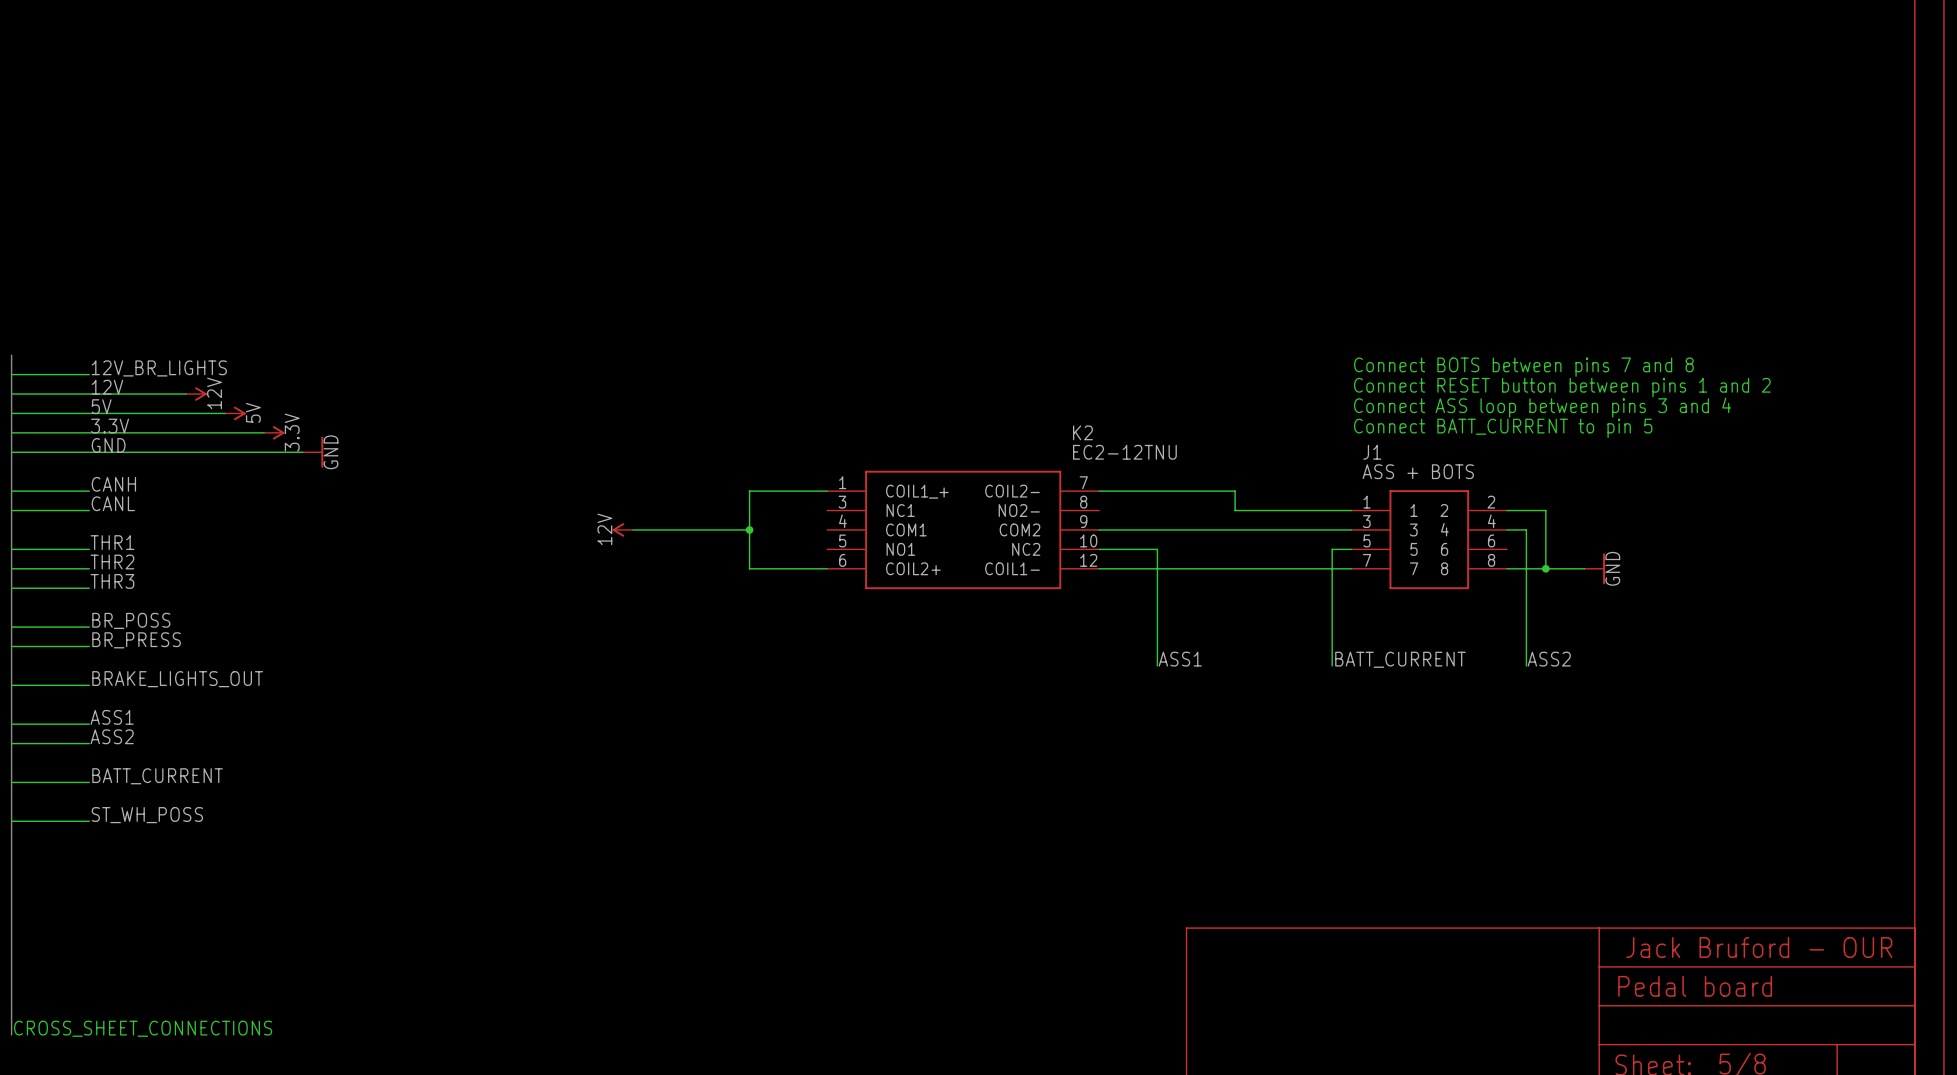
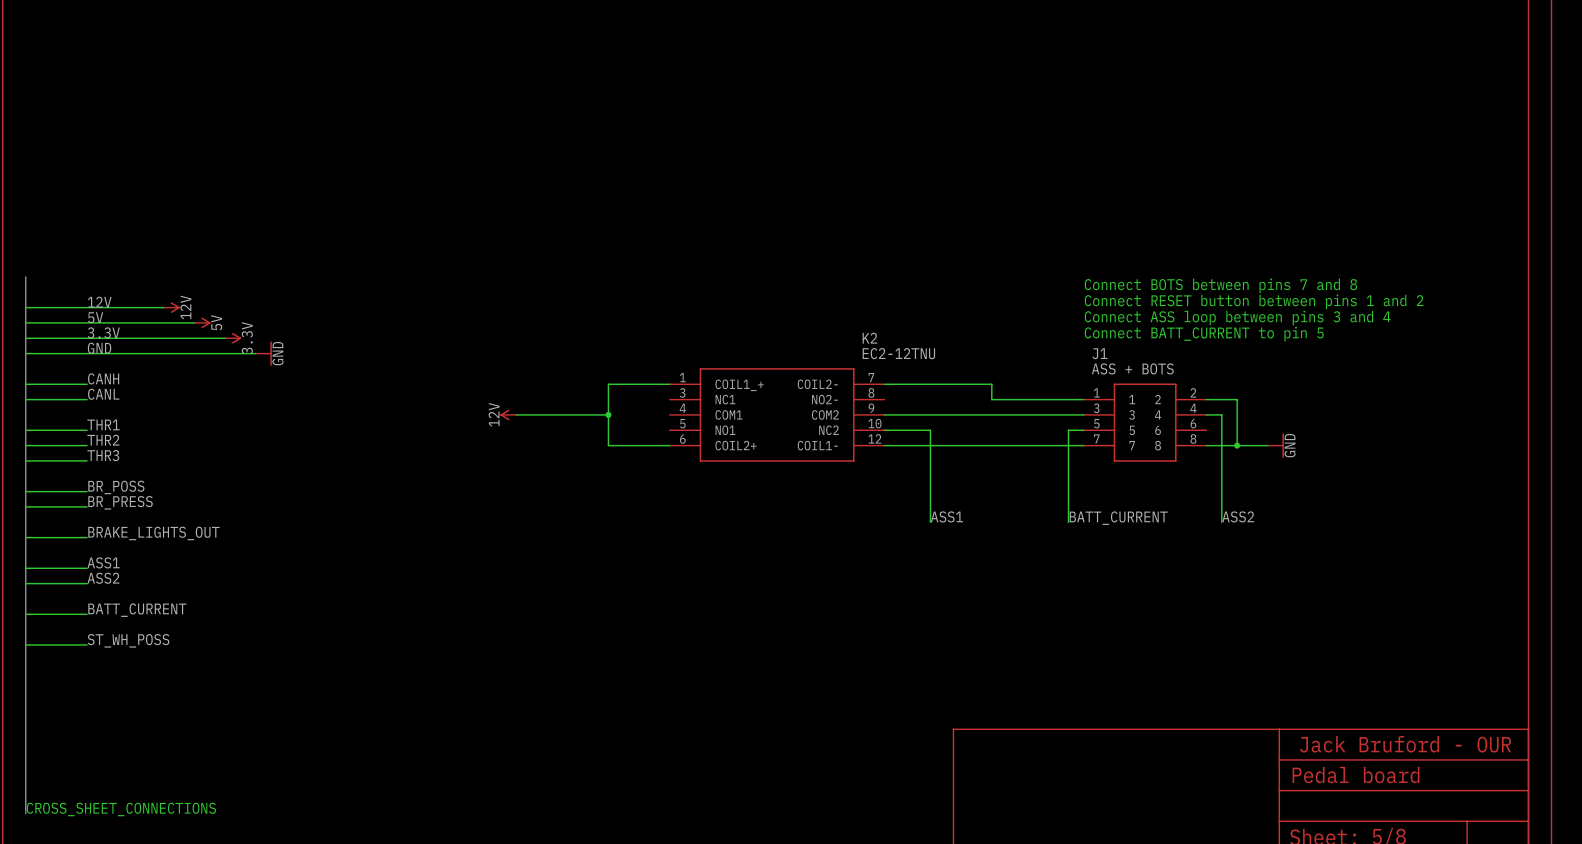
label: 12V_BR_LIGHTS (159, 368) -> none
wire: (11, 374) (89, 374) -> none

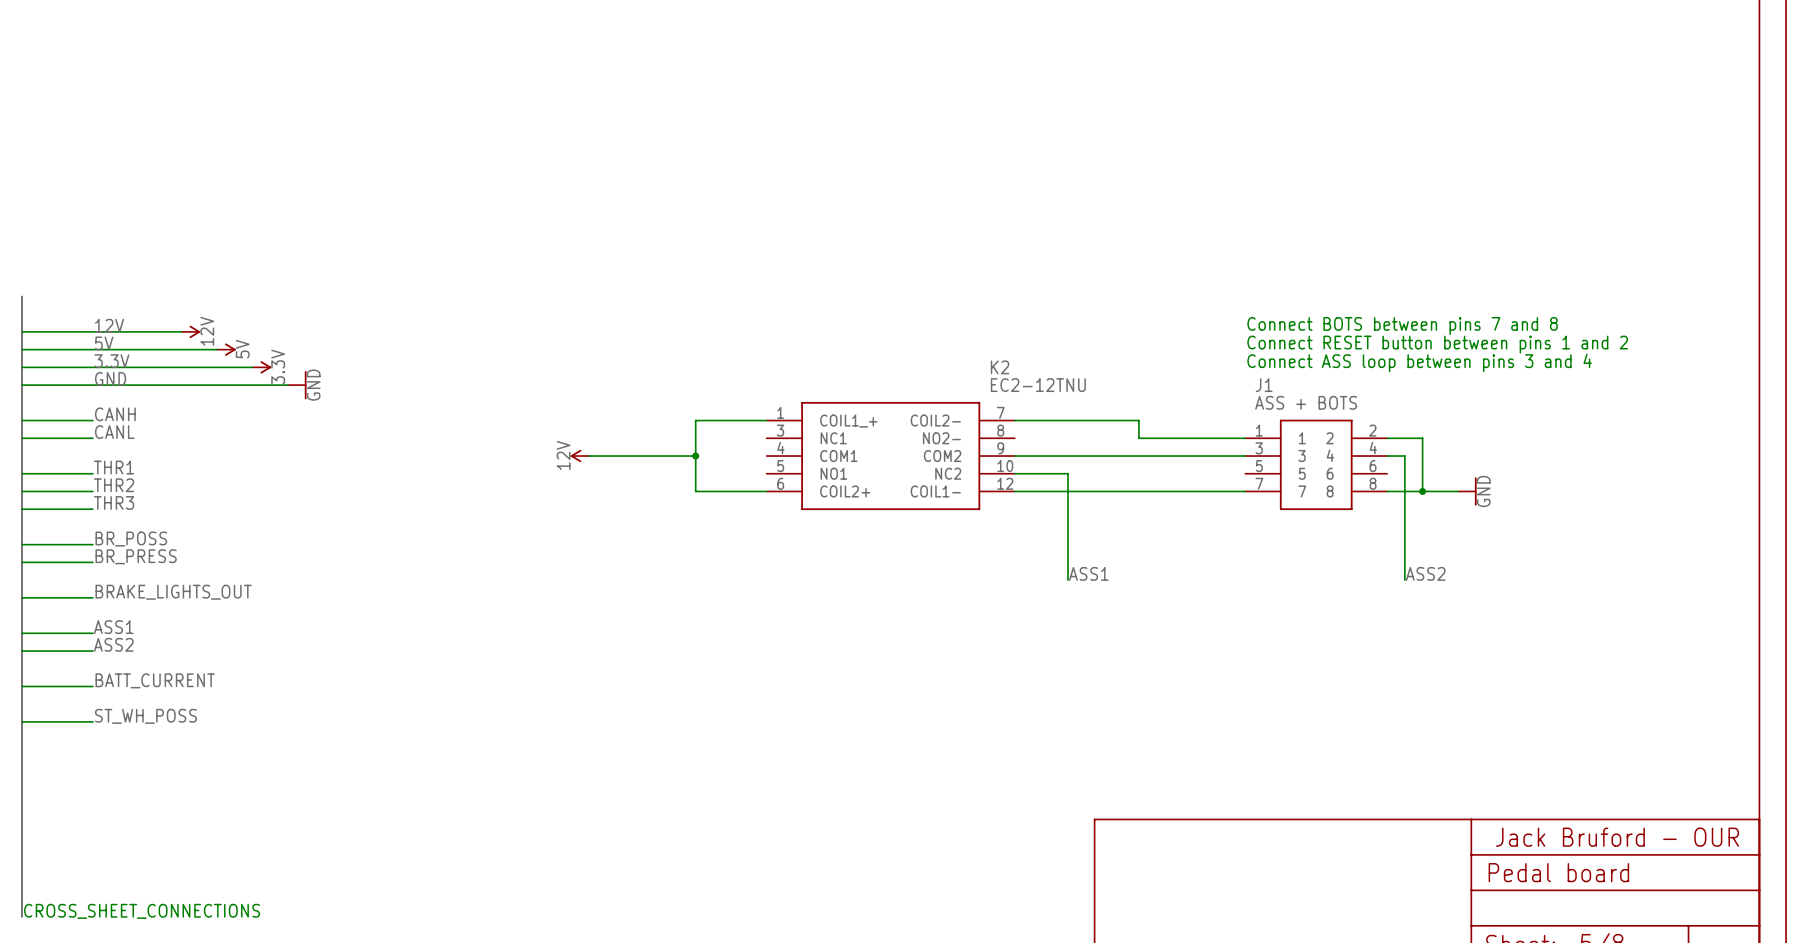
text: Connect BOTS between pins 7 and 8 (1220, 285) -> none
text: Connect RESET button between pins 1 and 2 (1254, 301) -> Connect BOTS between pins 7 and 8 (1402, 325)
text: Connect ASS loop between pins 3 and 4 (1237, 317) -> Connect RESET button between pins 1 and 2 (1437, 344)
text: Connect BATT_CURRENT to pin 5 (1204, 334) -> Connect ASS loop between pins 3 and 4 (1419, 362)
wire: (1083, 430) (1068, 430) (1068, 522) -> none
label: BATT_CURRENT (1118, 518) -> none

